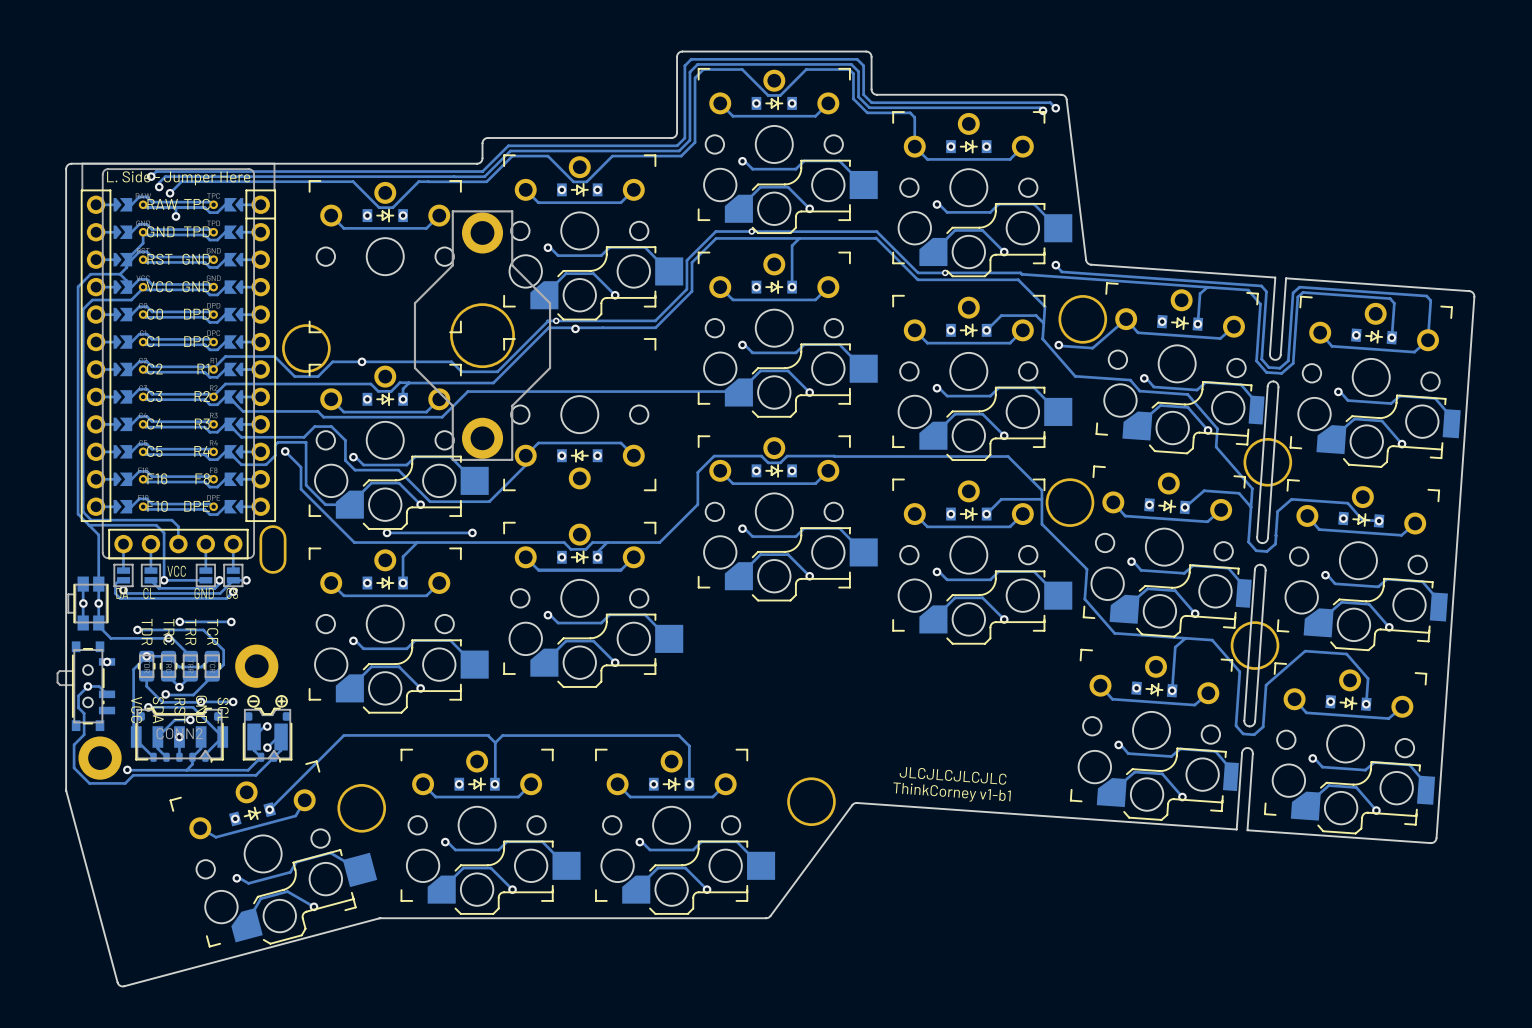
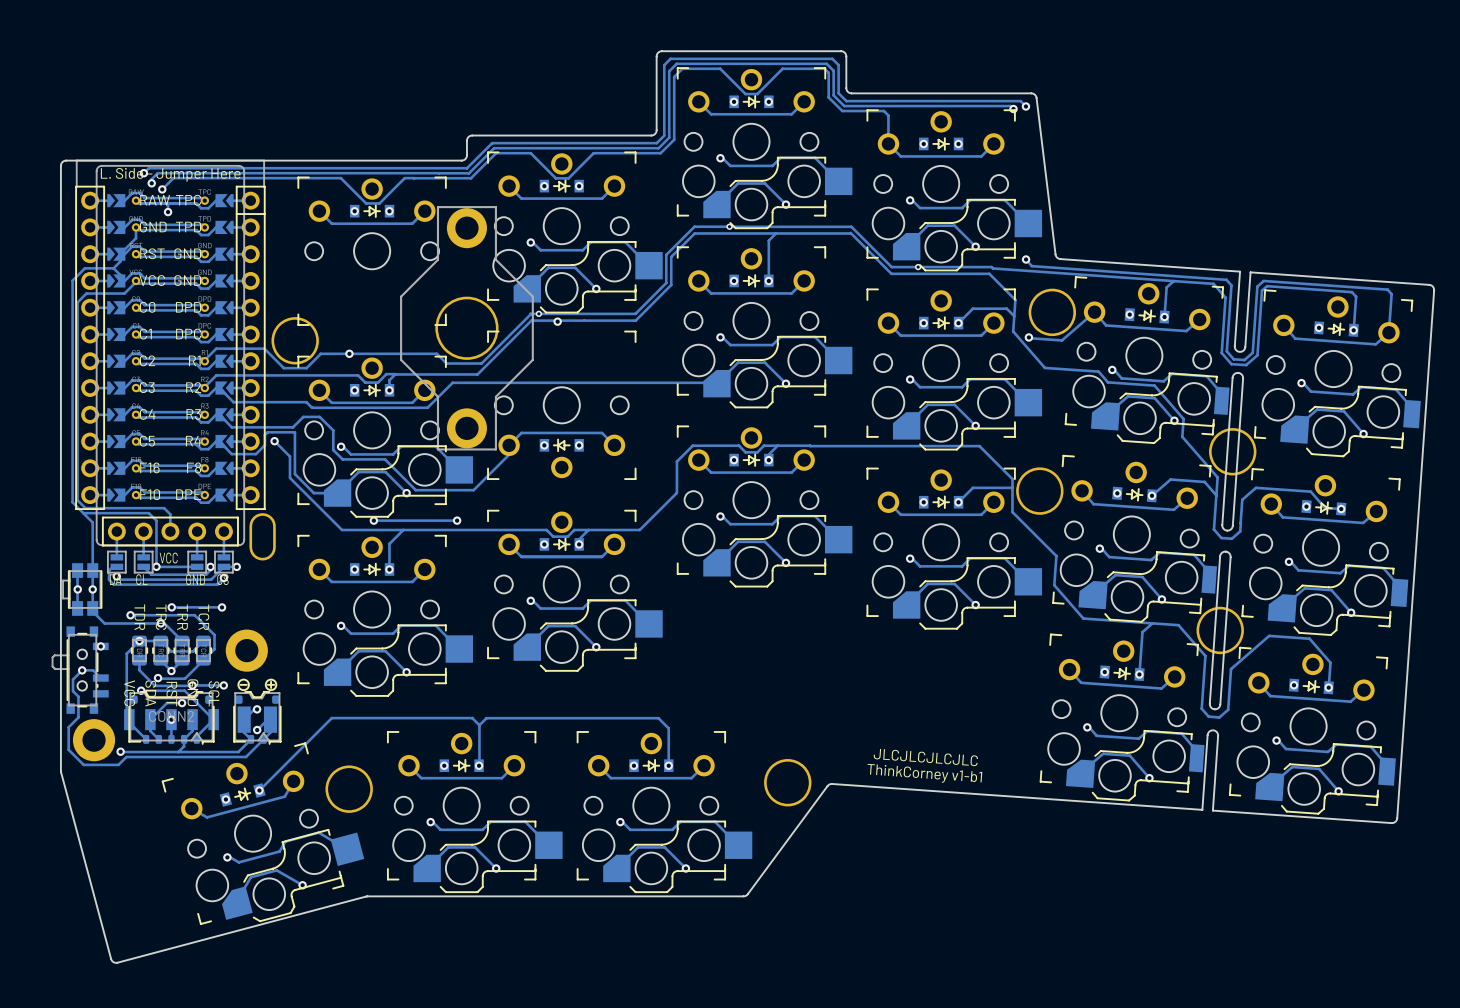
track: none -> (777, 445) (768, 454)

